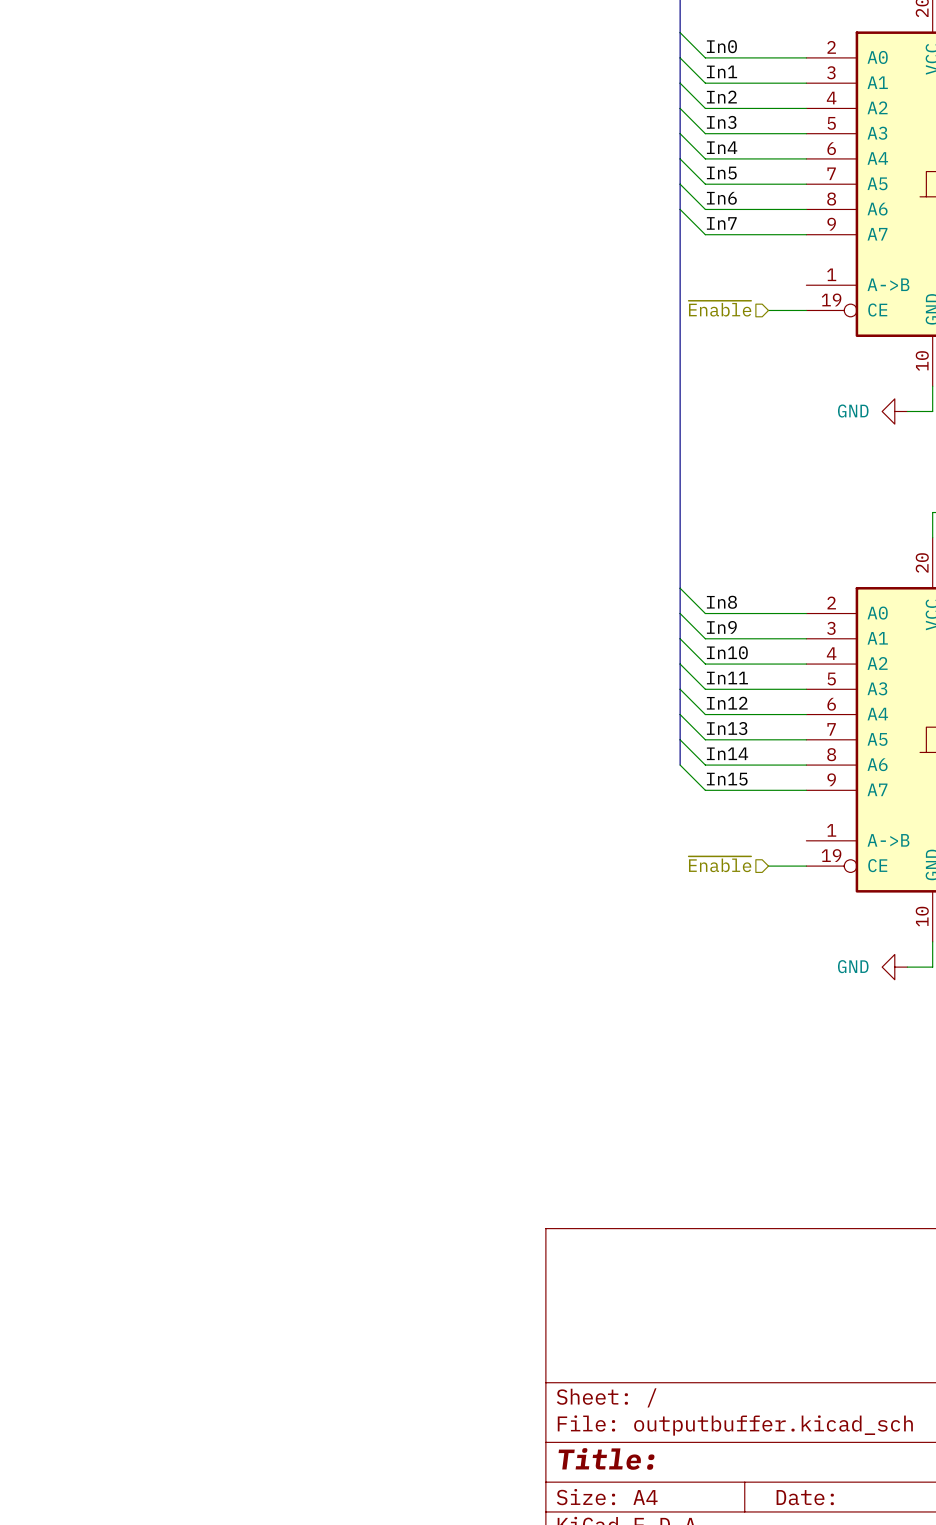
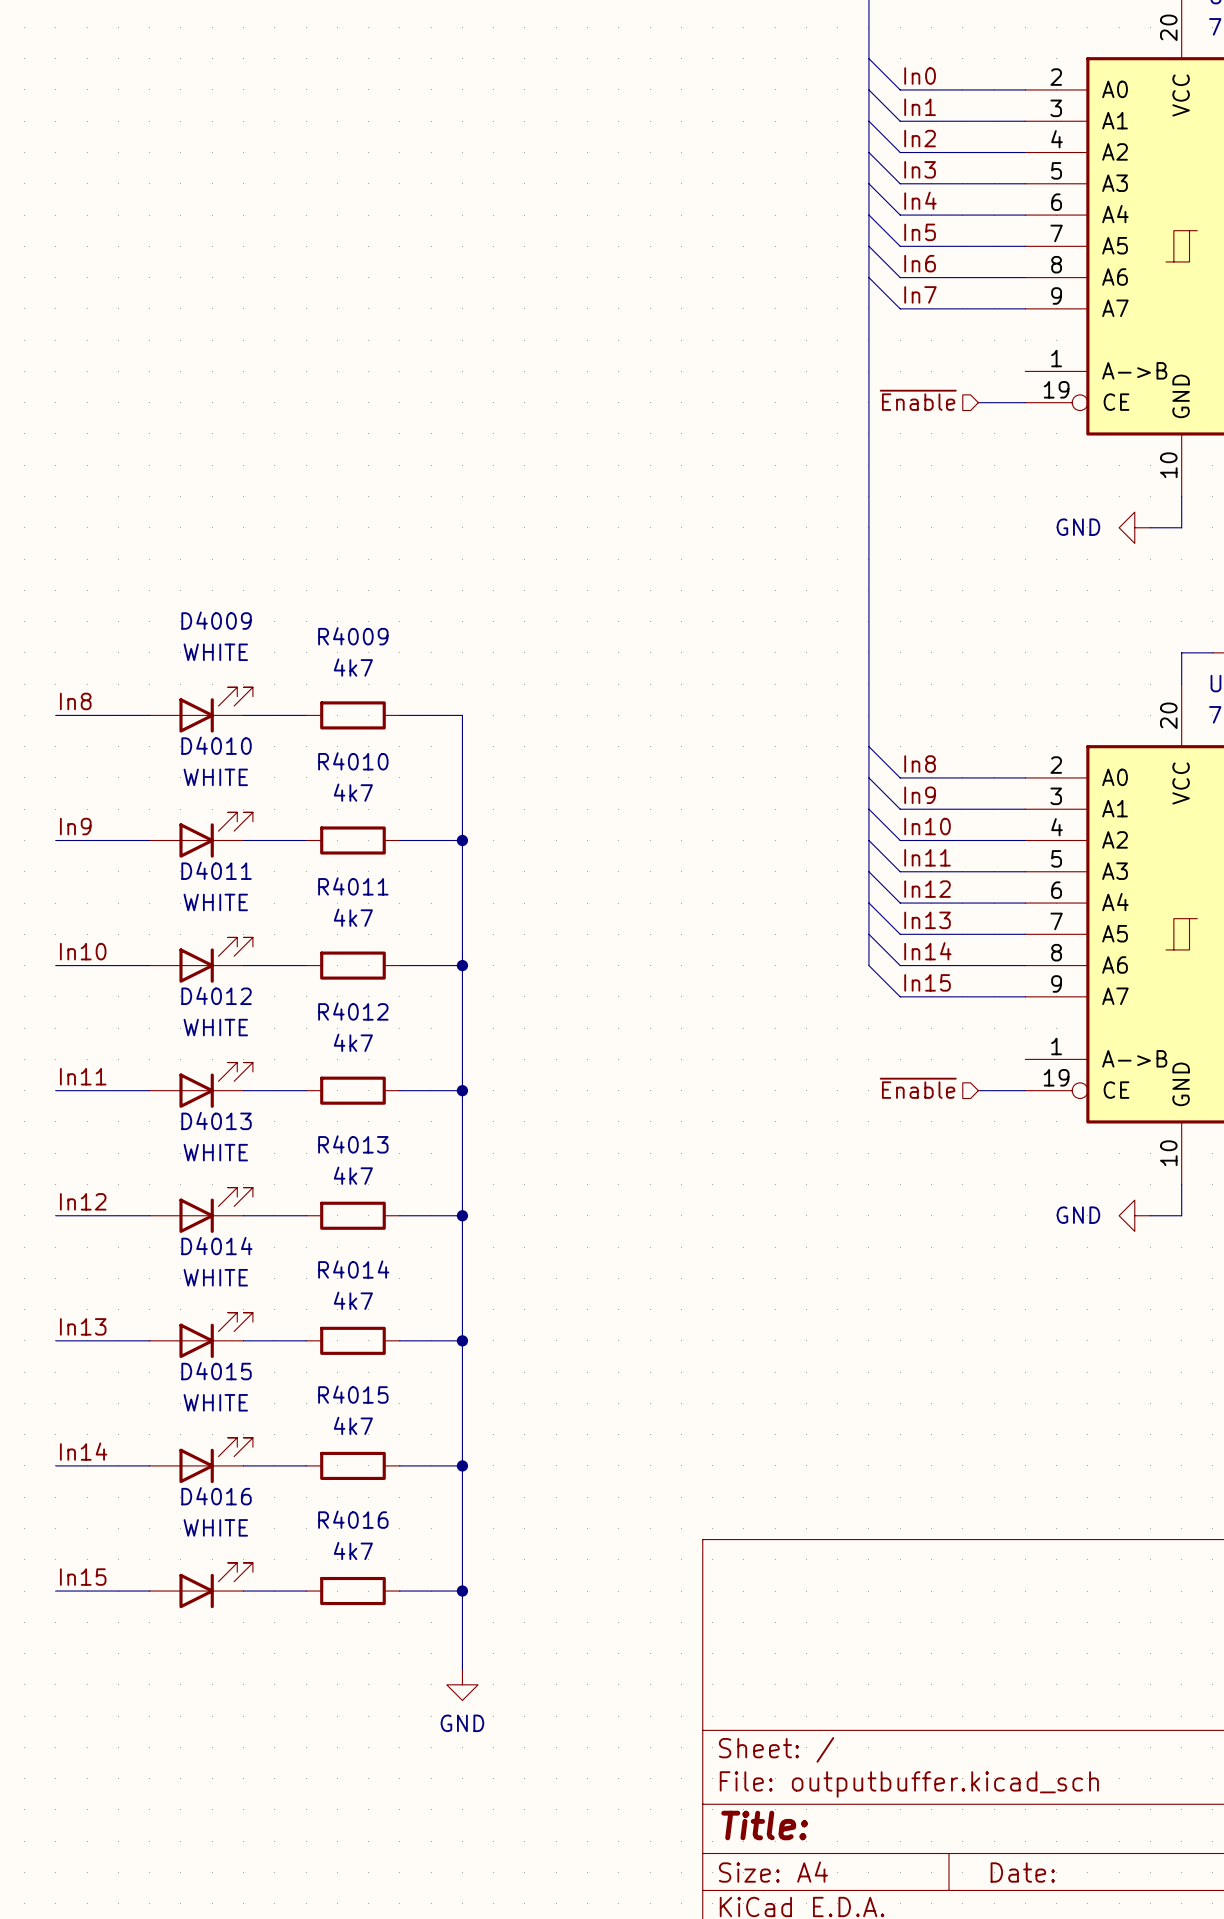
label: none -> In8 (75, 701)
D4009: none -> WHITE (201, 709)
wire: none -> (55, 715) (149, 715)
wire: none -> (243, 715) (306, 715)
R4009: none -> 4k7 (352, 715)
wire: none -> (399, 715) (462, 715) (462, 1669)
label: none -> In9 (75, 826)
D4010: none -> WHITE (201, 835)
wire: none -> (55, 840) (149, 840)
wire: none -> (243, 840) (306, 840)
R4010: none -> 4k7 (352, 840)
wire: none -> (399, 840) (462, 840)
junction: none -> (462, 840)
label: none -> In10 (83, 951)
D4011: none -> WHITE (201, 960)
wire: none -> (55, 965) (149, 965)
wire: none -> (243, 965) (306, 965)
R4011: none -> 4k7 (352, 965)
wire: none -> (399, 965) (462, 965)
junction: none -> (462, 965)
label: none -> In11 (83, 1076)
D4012: none -> WHITE (201, 1085)
wire: none -> (55, 1090) (149, 1090)
wire: none -> (243, 1090) (306, 1090)
R4012: none -> 4k7 (352, 1090)
wire: none -> (399, 1090) (462, 1090)
junction: none -> (462, 1090)
label: none -> In12 (83, 1201)
D4013: none -> WHITE (201, 1210)
wire: none -> (55, 1215) (149, 1215)
wire: none -> (243, 1215) (306, 1215)
R4013: none -> 4k7 (352, 1215)
wire: none -> (399, 1215) (462, 1215)
junction: none -> (462, 1215)
label: none -> In13 (83, 1326)
D4014: none -> WHITE (201, 1335)
wire: none -> (55, 1340) (149, 1340)
wire: none -> (243, 1340) (306, 1340)
R4014: none -> 4k7 (352, 1340)
wire: none -> (399, 1340) (462, 1340)
junction: none -> (462, 1340)
label: none -> In14 (83, 1451)
D4015: none -> WHITE (201, 1460)
wire: none -> (55, 1465) (149, 1465)
wire: none -> (243, 1465) (306, 1465)
R4015: none -> 4k7 (352, 1465)
wire: none -> (399, 1465) (462, 1465)
junction: none -> (462, 1465)
label: none -> In15 (83, 1577)
D4016: none -> WHITE (201, 1585)
wire: none -> (55, 1591) (149, 1591)
wire: none -> (243, 1591) (306, 1591)
R4016: none -> 4k7 (352, 1591)
wire: none -> (399, 1591) (462, 1591)
junction: none -> (462, 1591)
power symbol: none -> GND (462, 1684)

